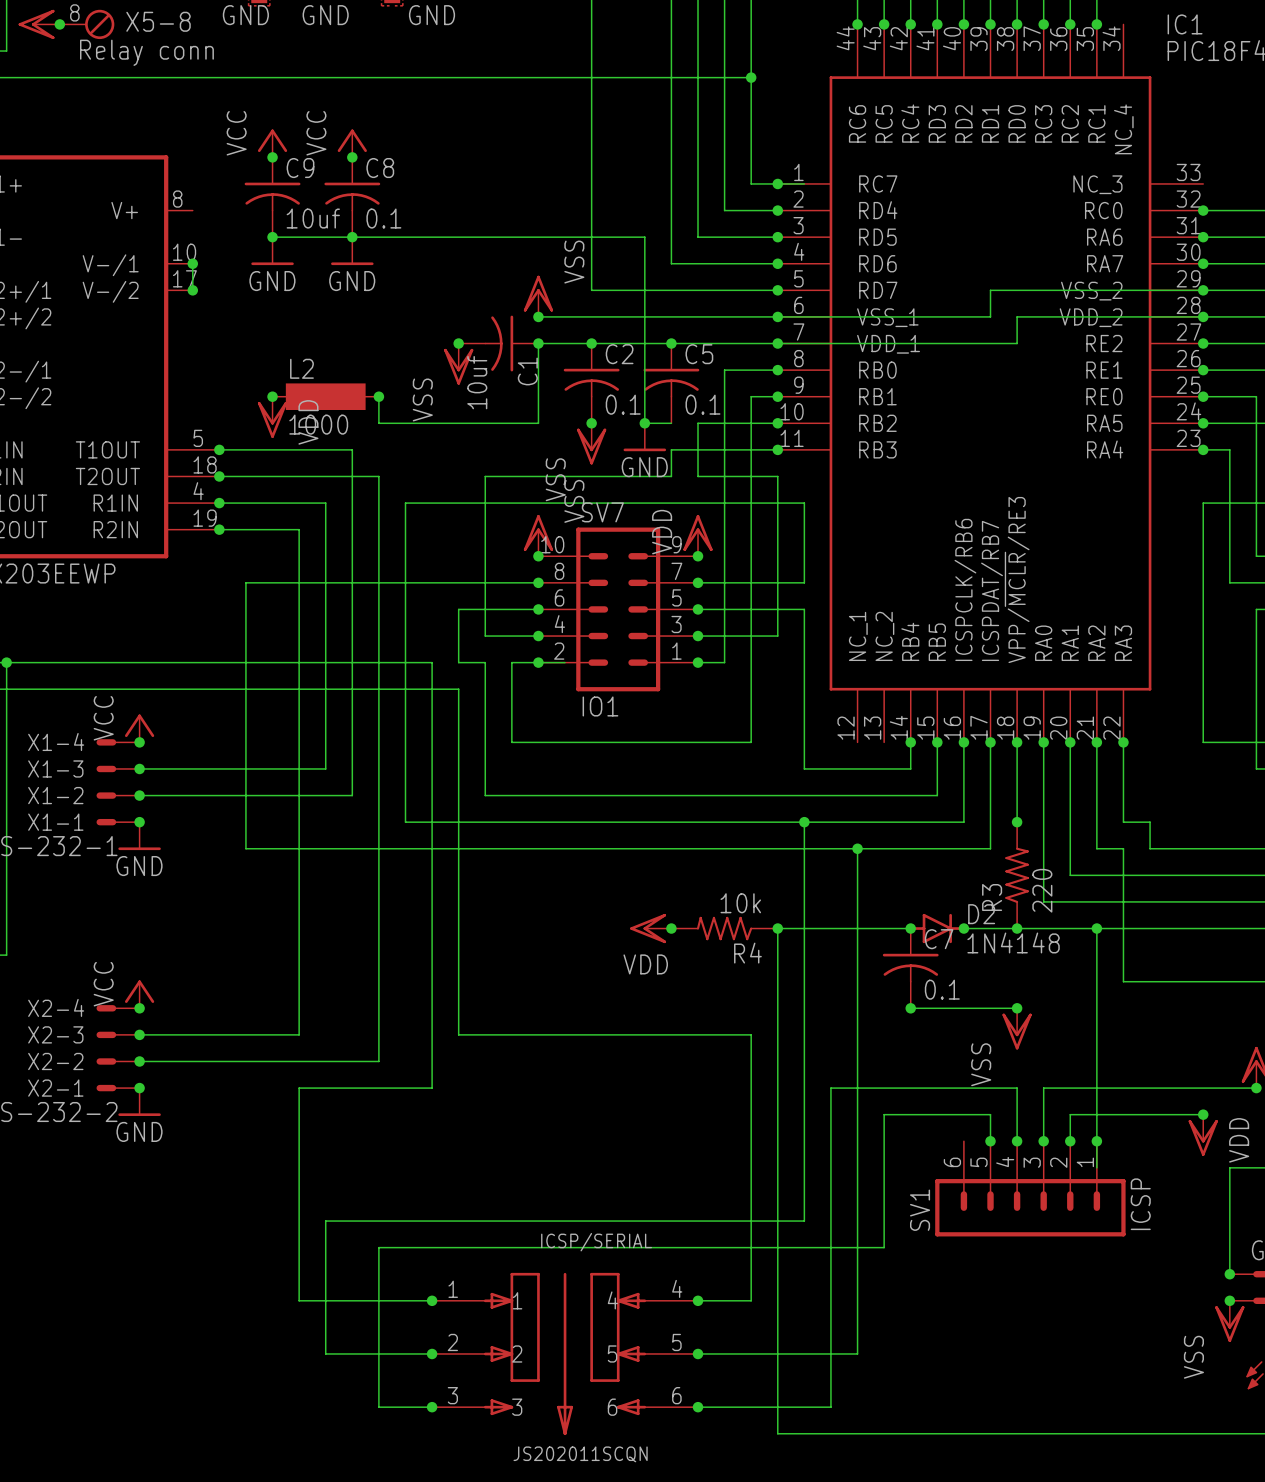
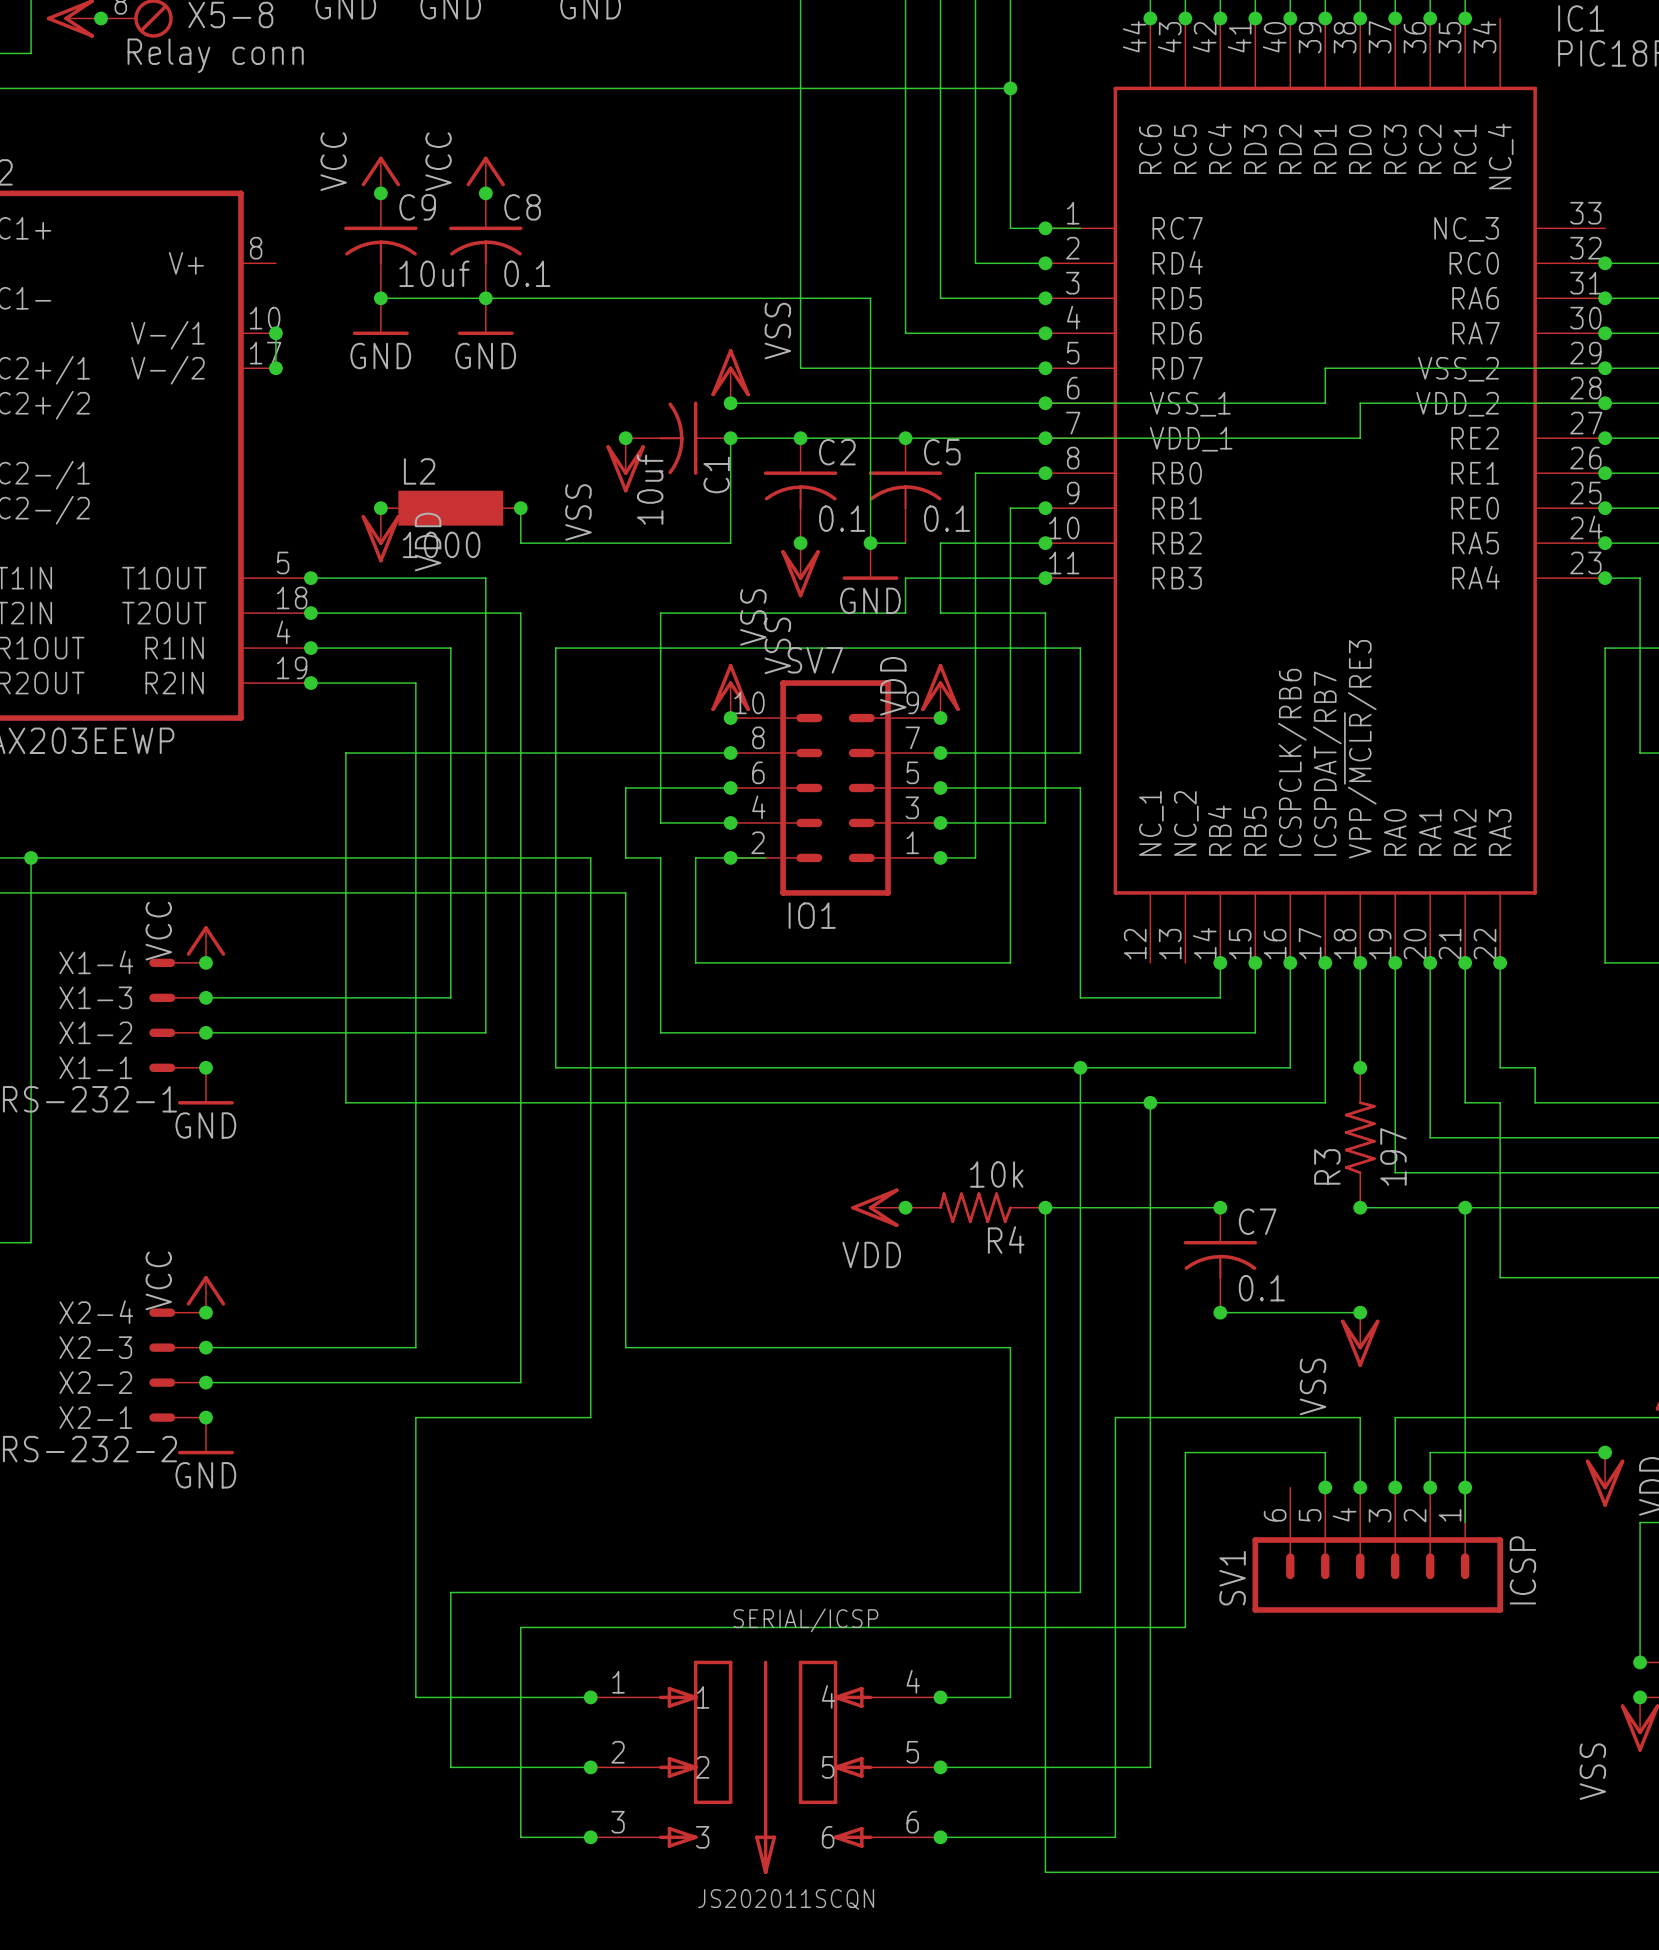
R3 value: 220 (1042, 890) -> 197 (1393, 1156)
D2: 1N4148 (937, 928) -> none
wire: (963, 928) (1017, 928) -> none
junction: (963, 928) -> none
ICSP/SERIAL name: ICSP/SERIAL (596, 1242) -> SERIAL/ICSP (805, 1620)

